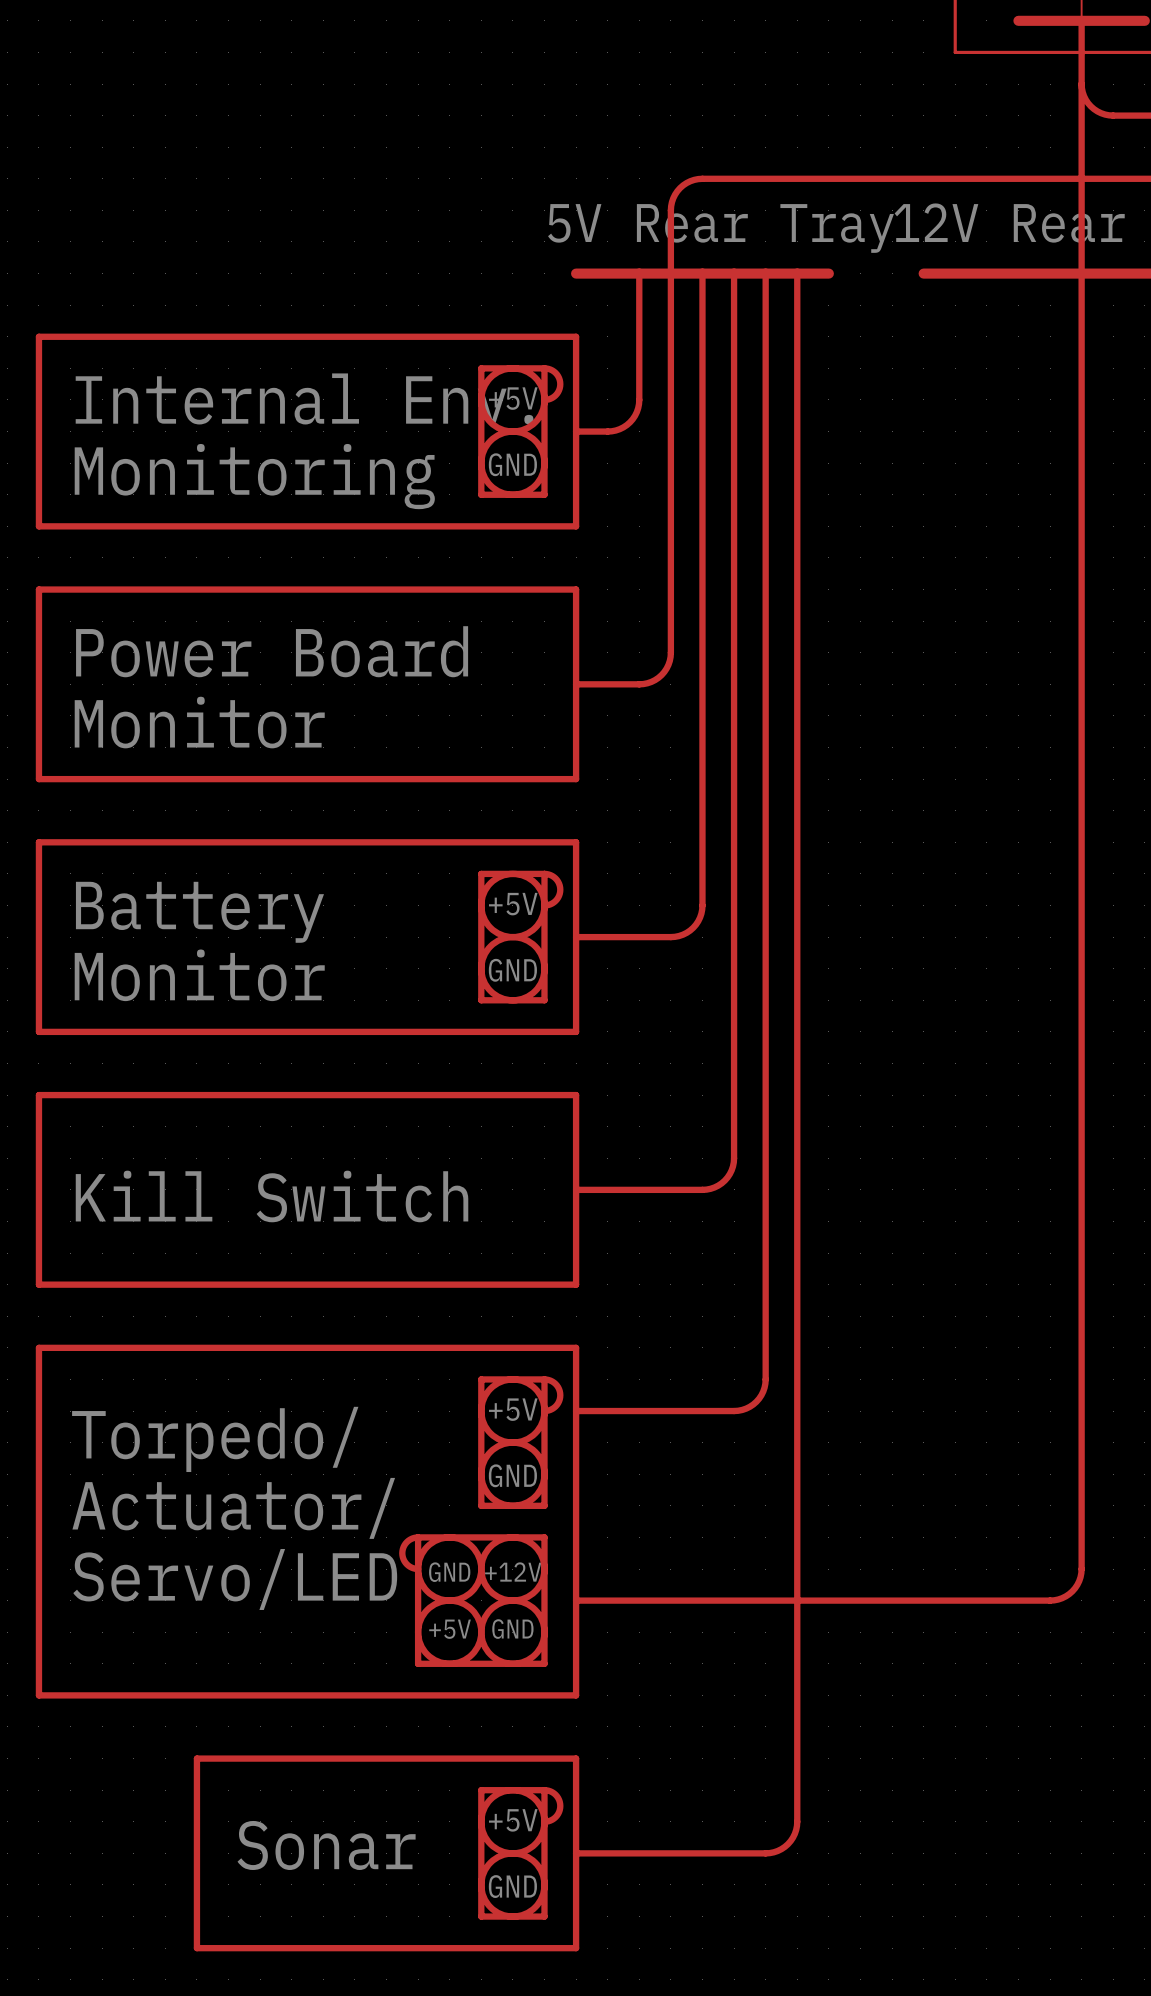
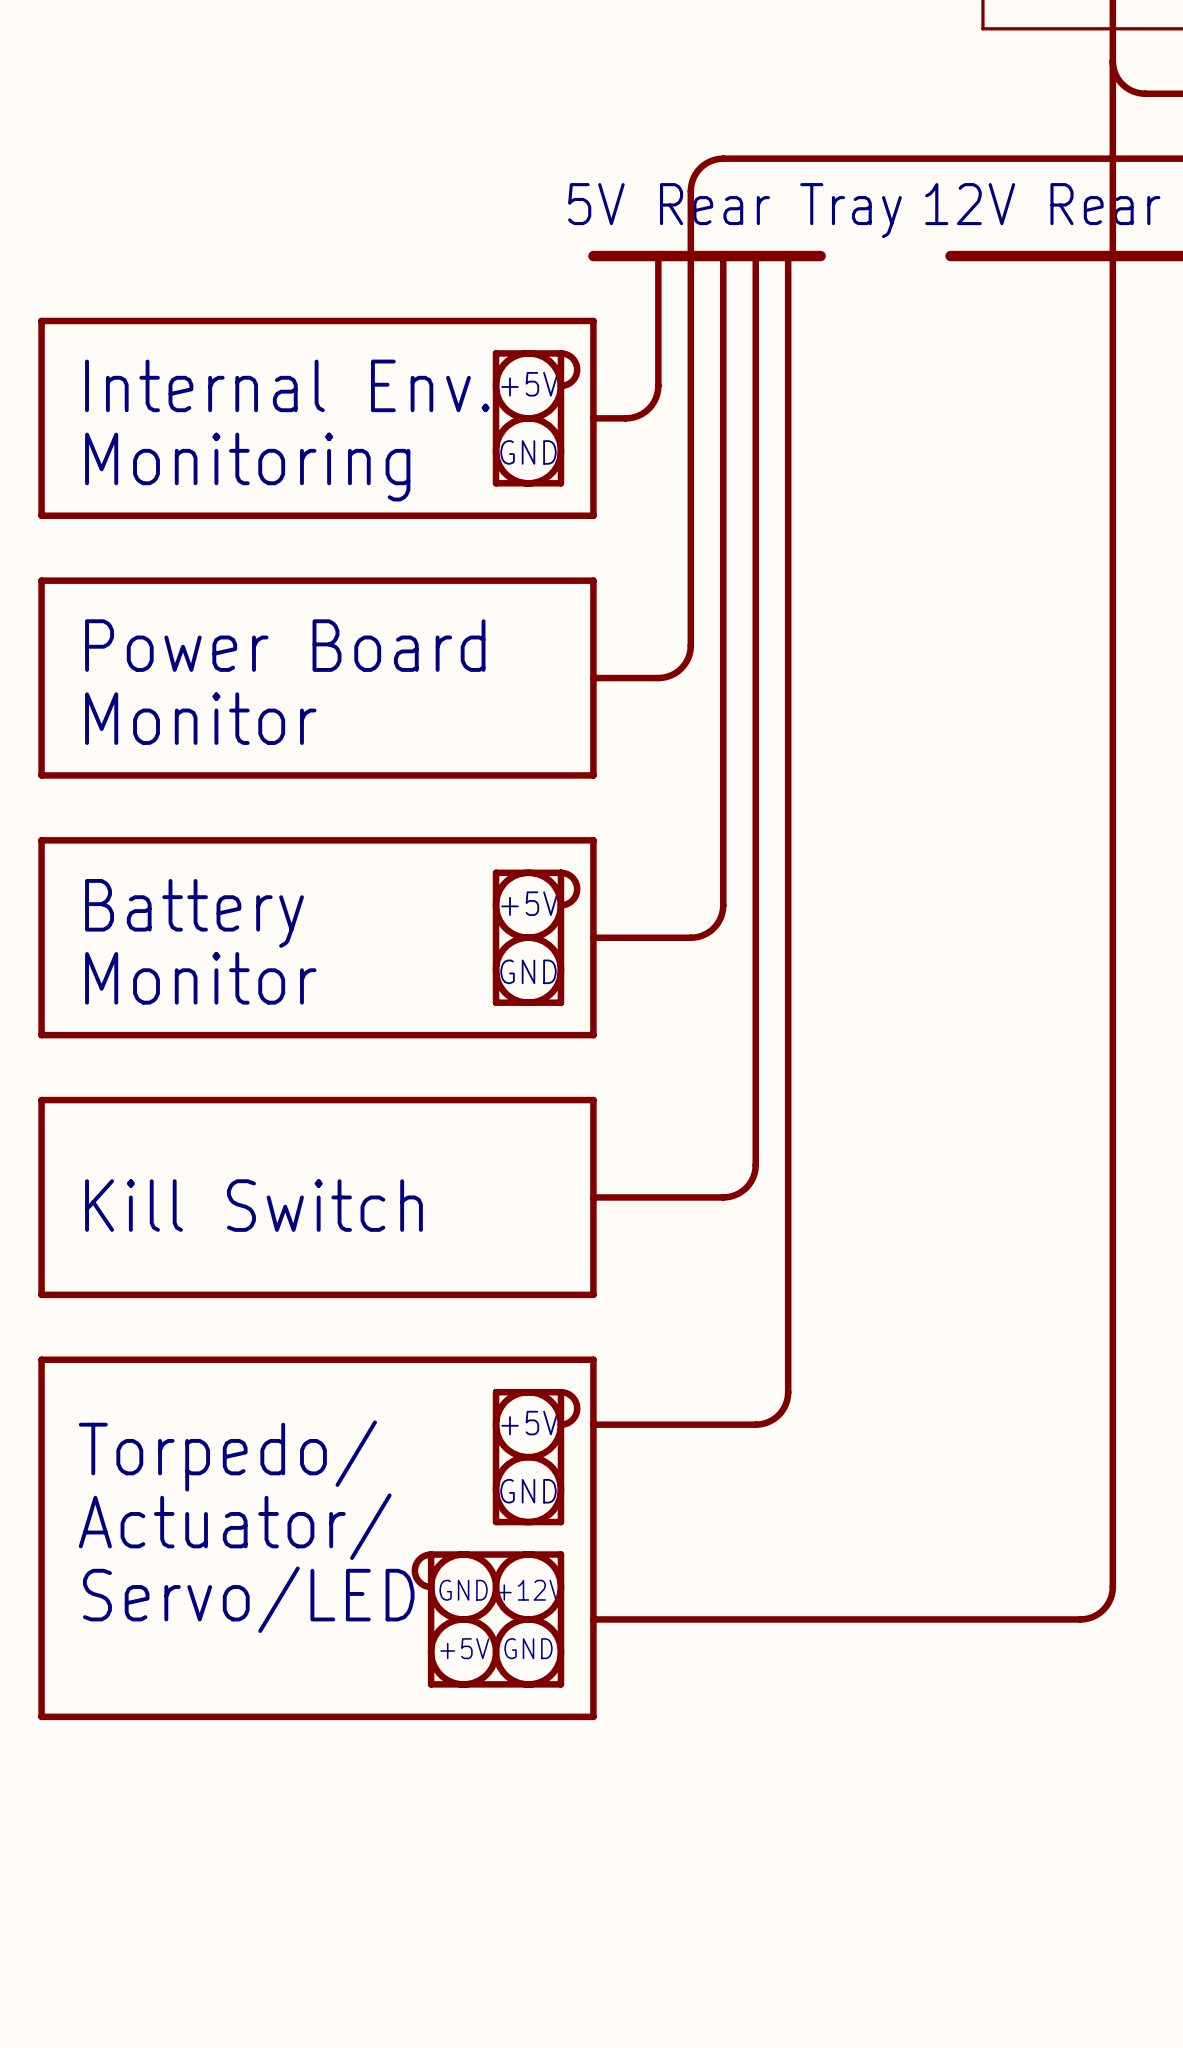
line: (828, 273) (797, 273) (796, 1825) (794, 1833) (788, 1844) (777, 1850) (769, 1853) (576, 1853) -> none
line: (196, 1758) (576, 1758) (576, 1948) (196, 1948) (196, 1758) -> none
drawing: [478, 1787, 548, 1920] -> none
line: (544, 1790) (544, 1916) (481, 1916) (481, 1790) (544, 1790) -> none
line: (544, 1790) (555, 1794) (560, 1805) (555, 1817) (544, 1821) -> none
text: +5V (513, 1820) -> none
text: Sonar (326, 1845) -> none
text: GND (512, 1886) -> none

